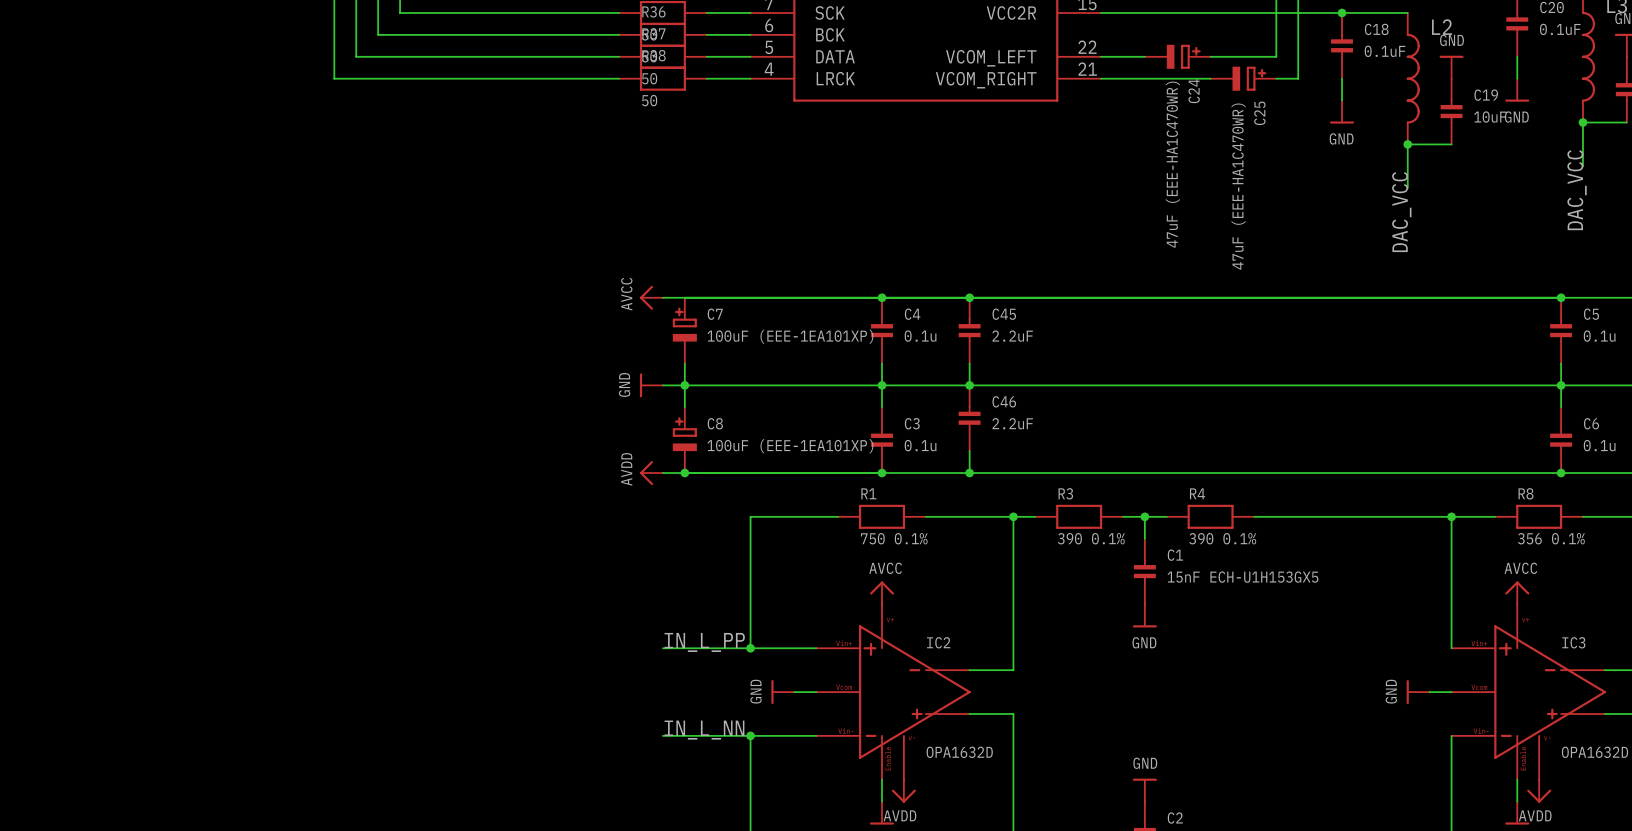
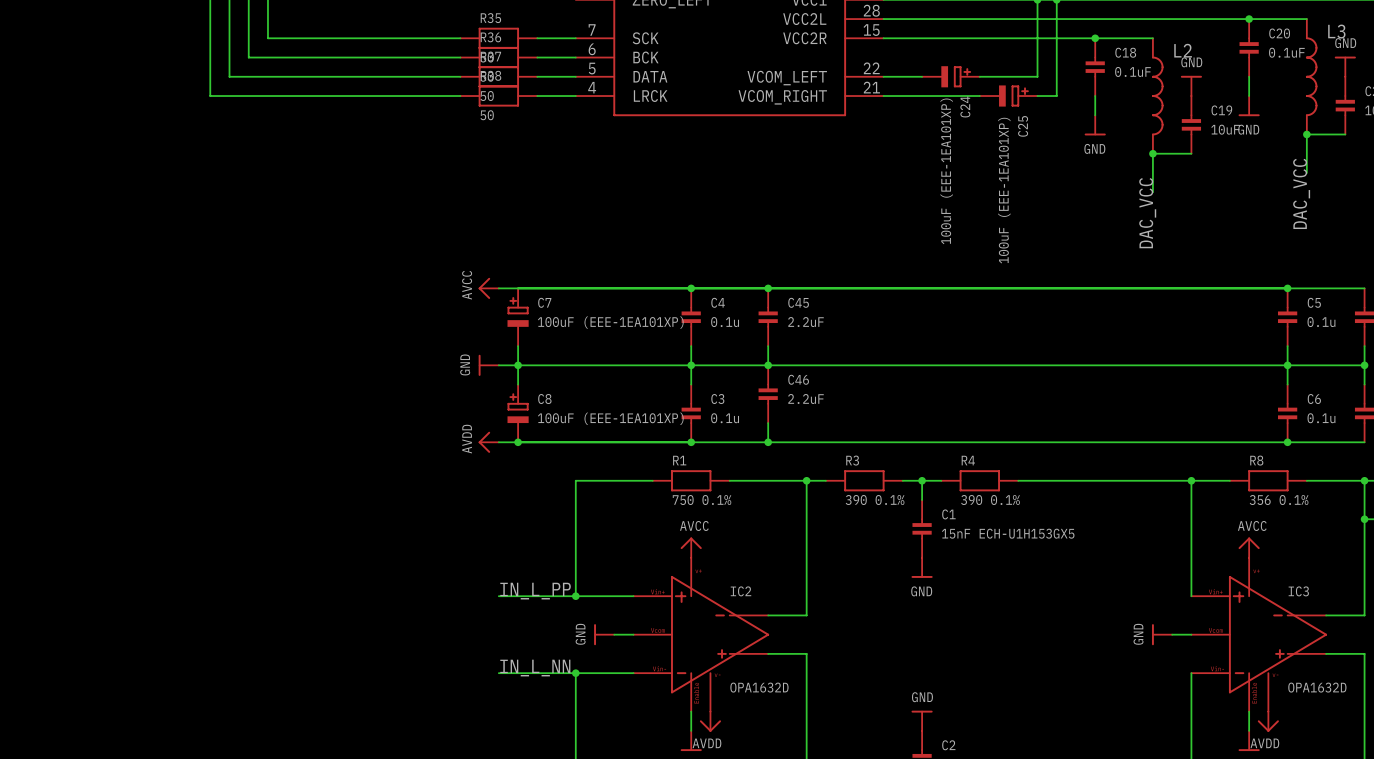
C24 value: 47uF (EEE-HA1C470WR) (1172, 164) -> 100uF (EEE-1EA101XP) (946, 171)
C25 value: 47uF (EEE-HA1C470WR) (1238, 186) -> 100uF (EEE-1EA101XP) (1004, 190)

